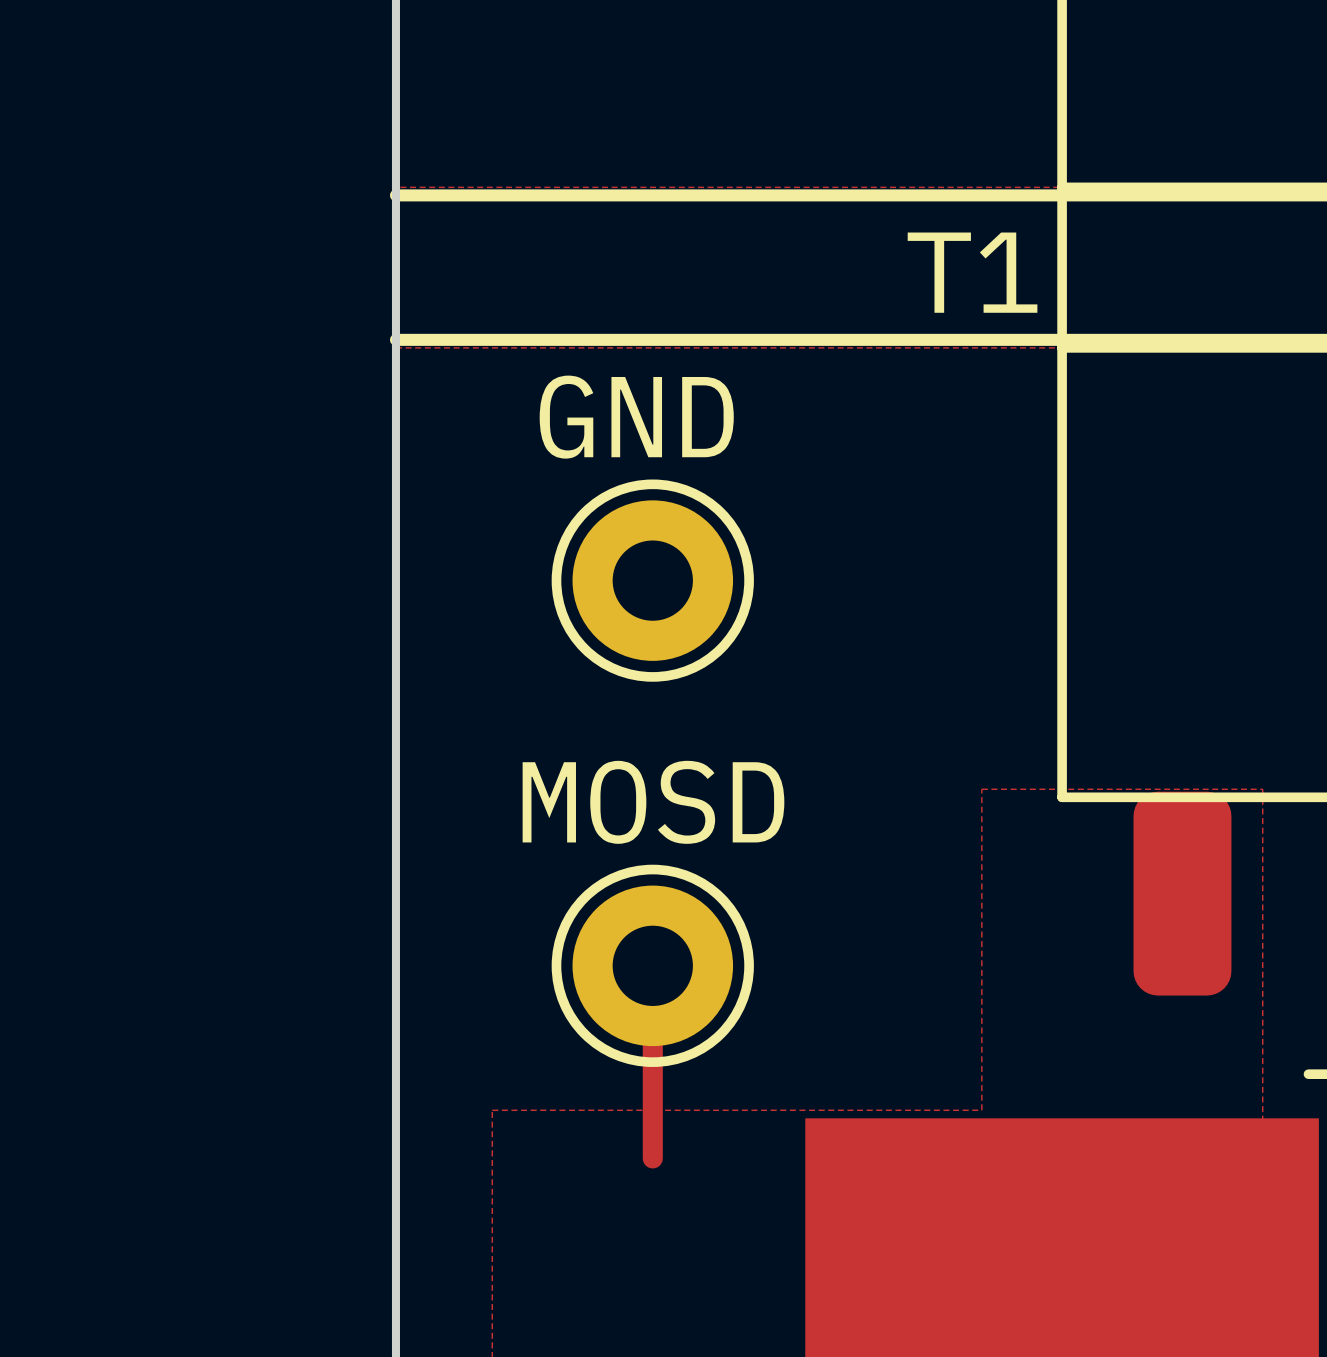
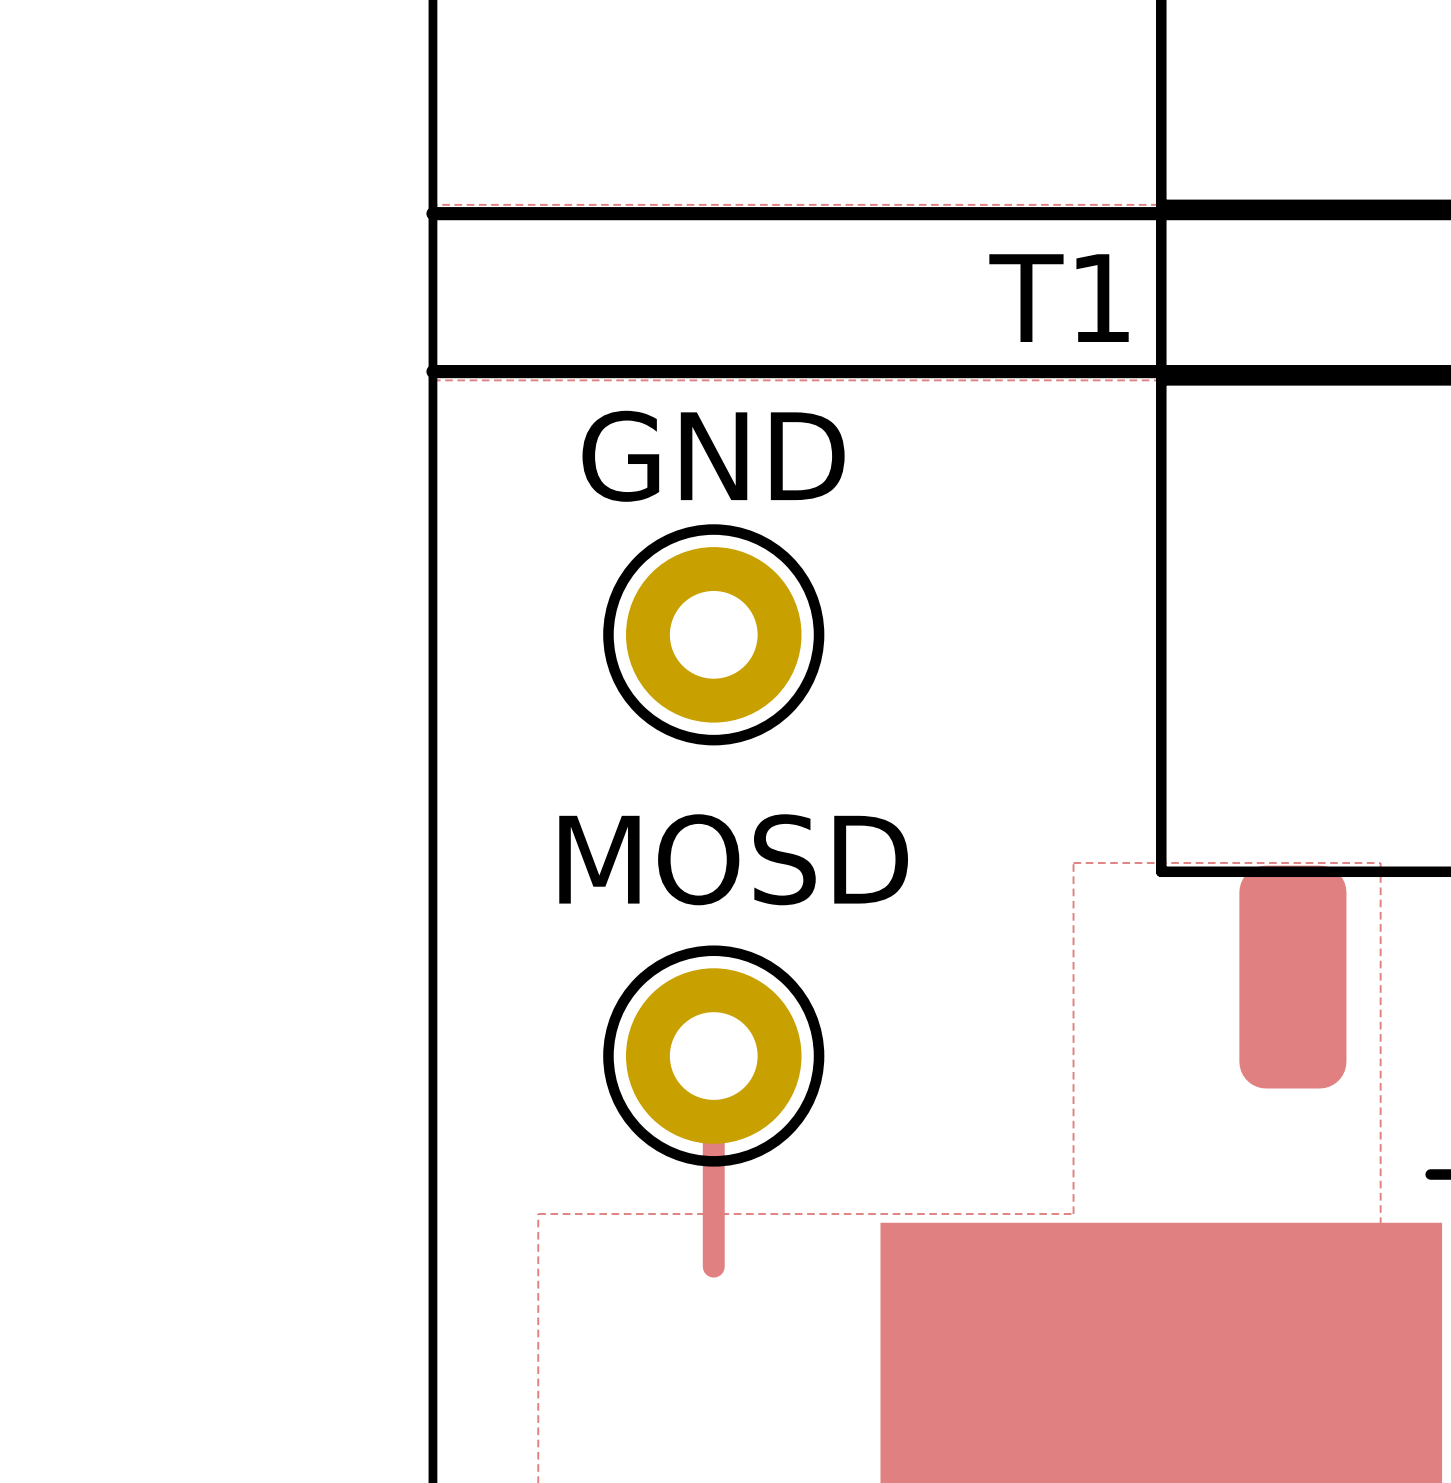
GND value: GND (636, 417) -> none
GND name: none -> GND (713, 456)
MOSD name: none -> MOSD (733, 859)
MOSD value: MOSD (653, 802) -> none

